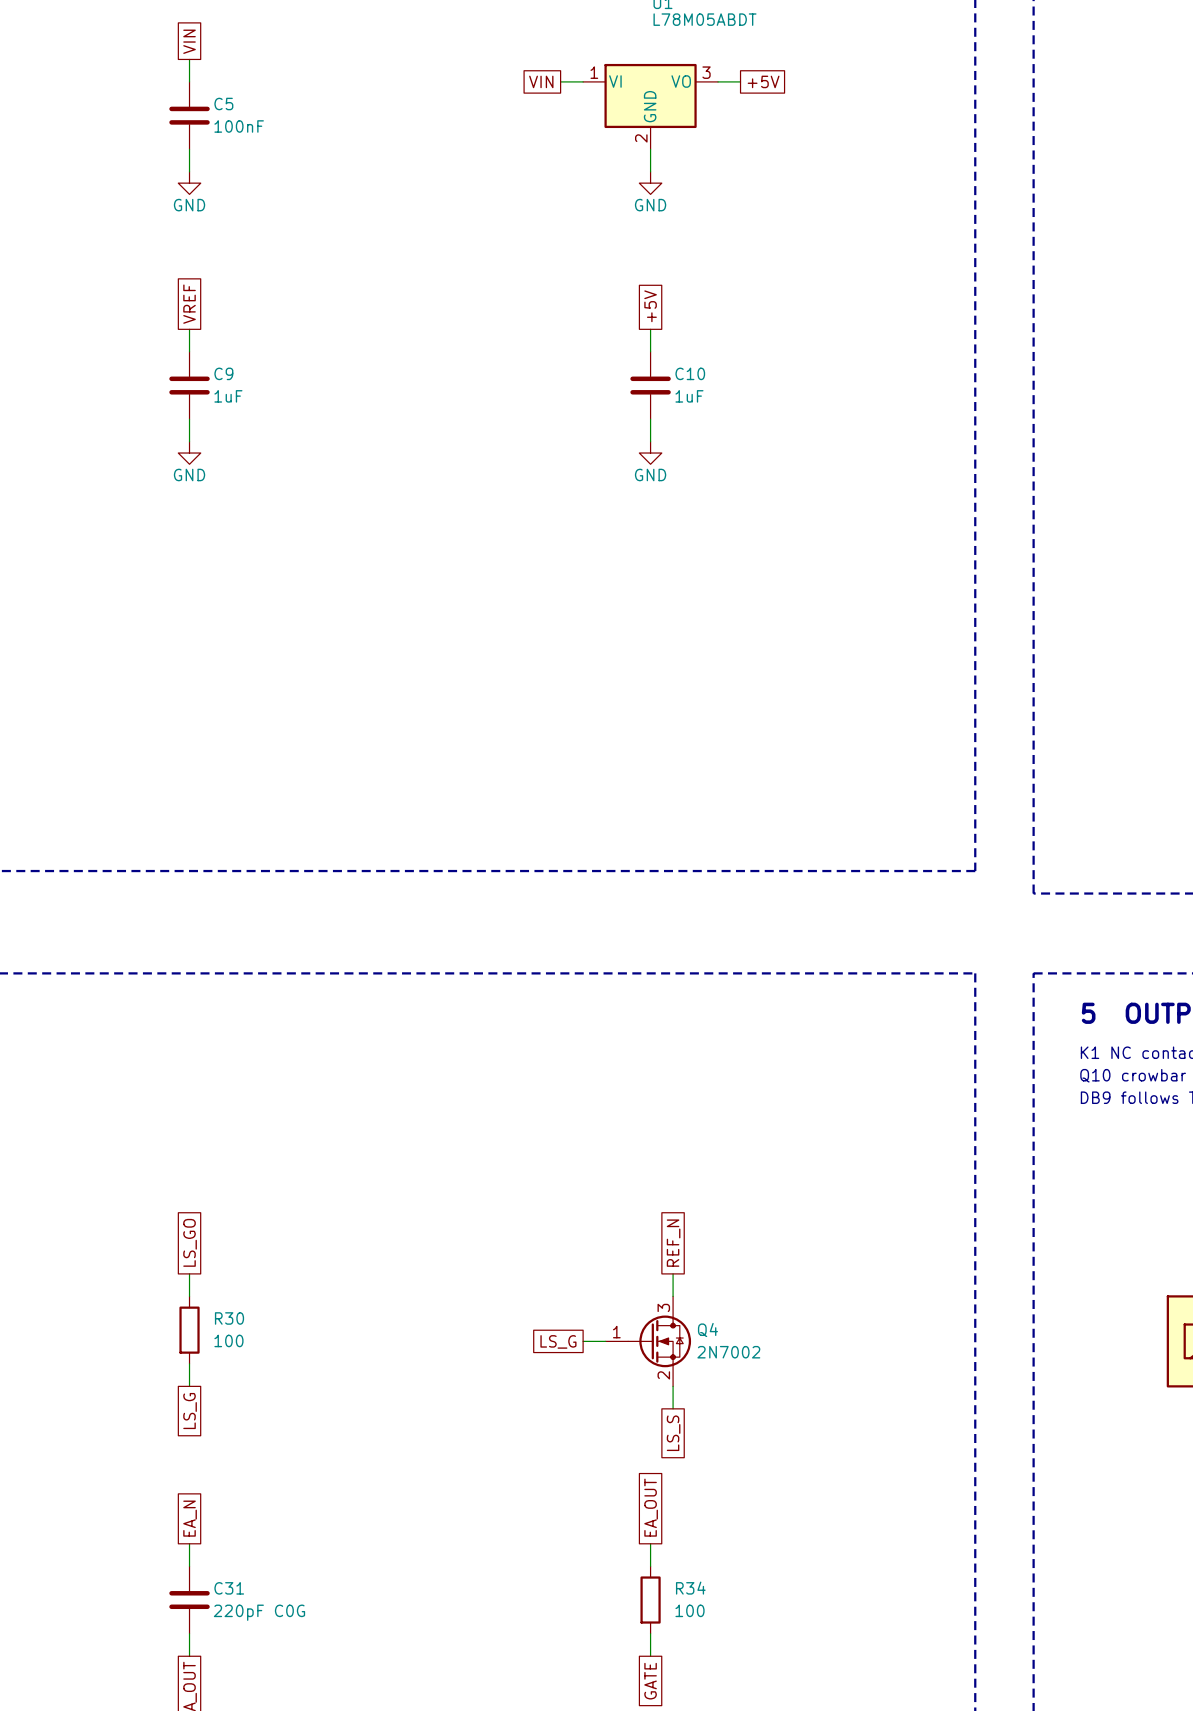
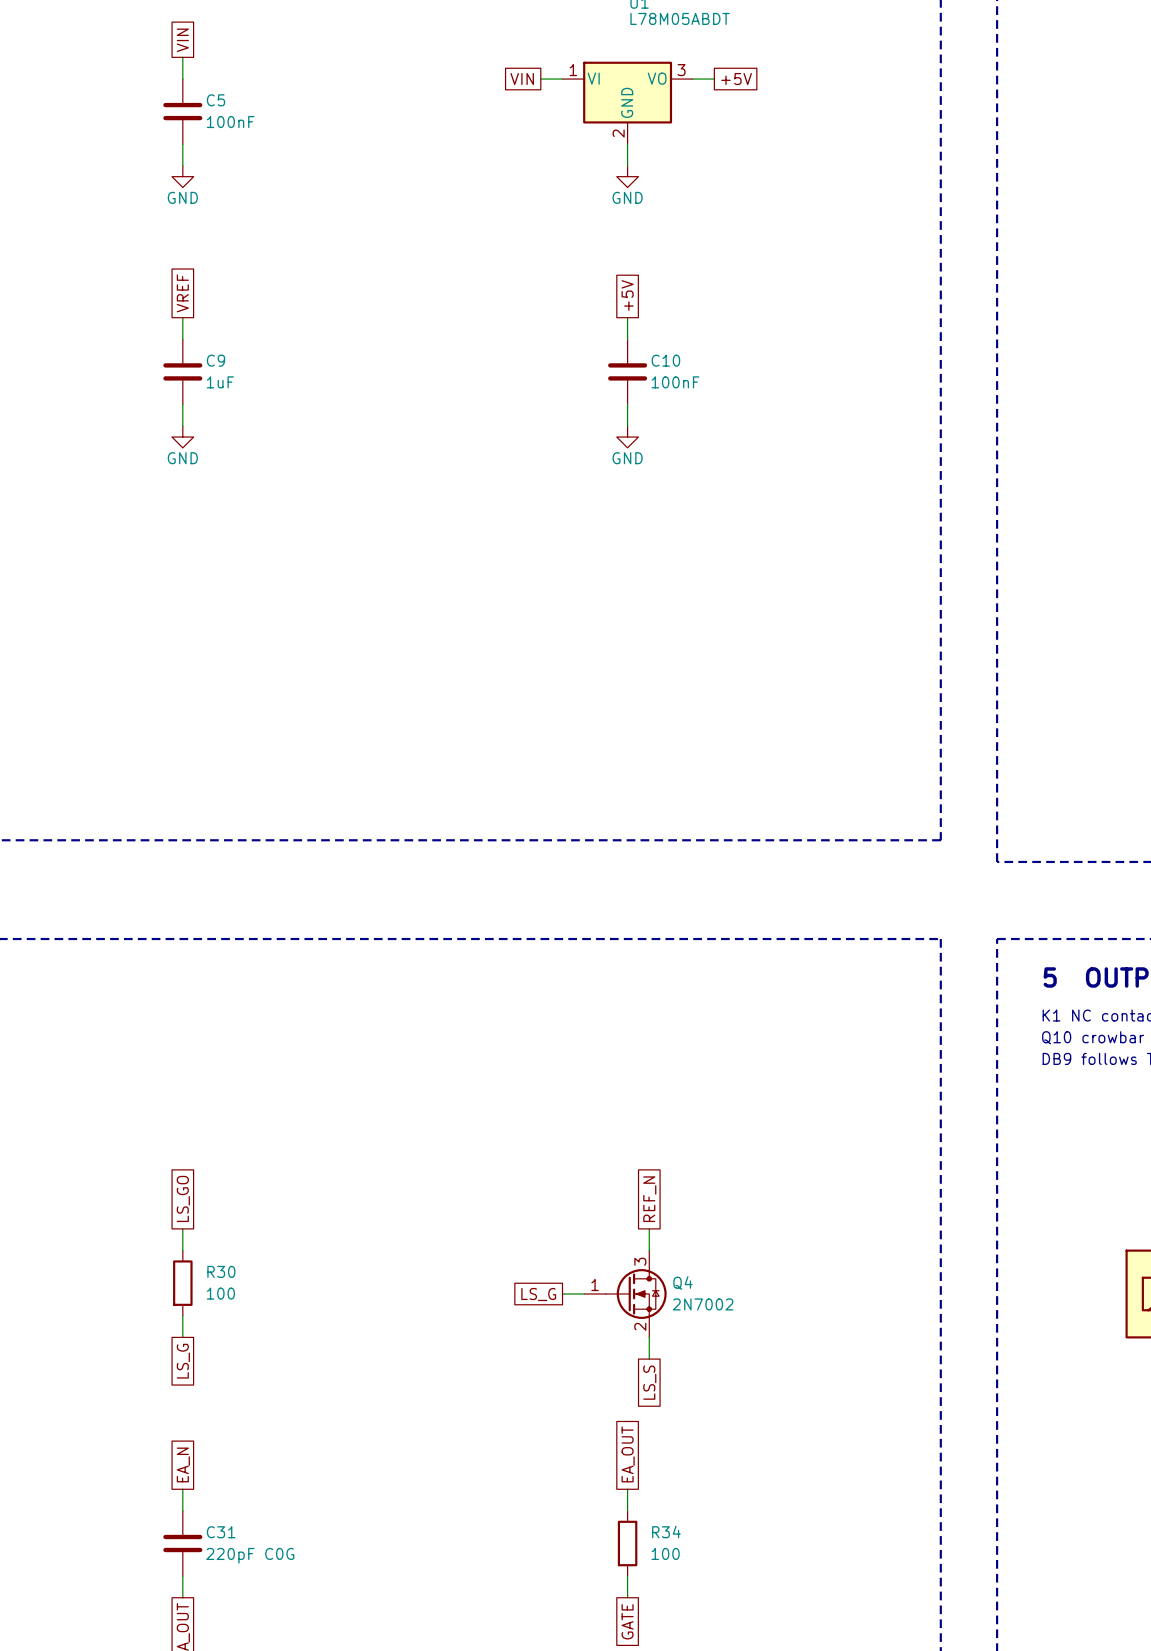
C10 value: 1uF (689, 396) -> 100nF (675, 382)

